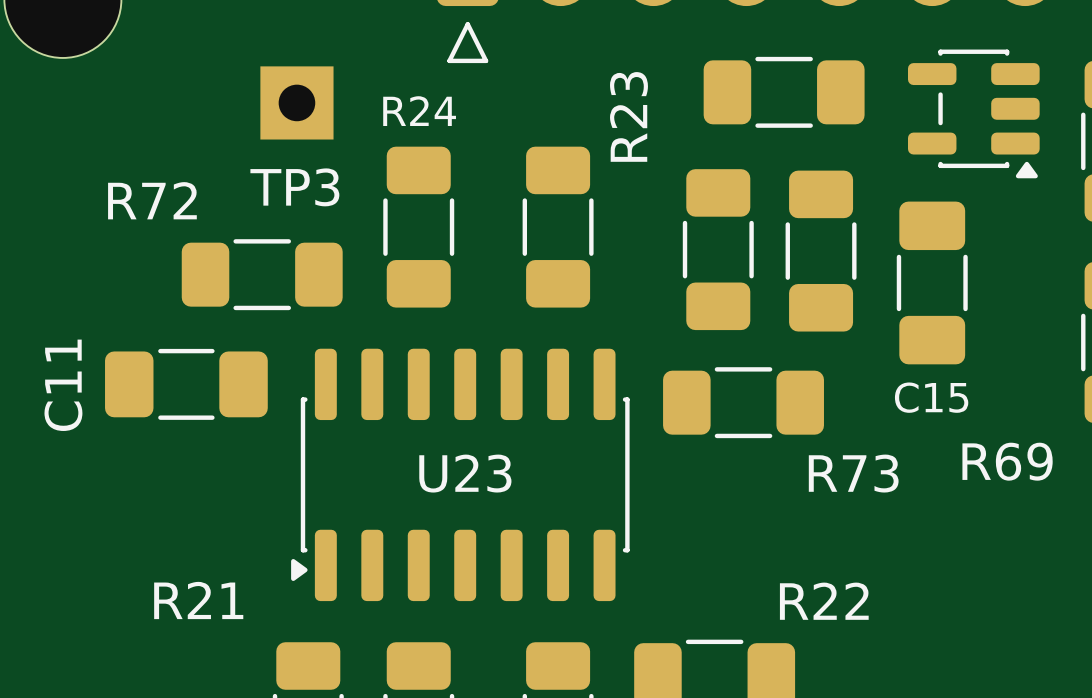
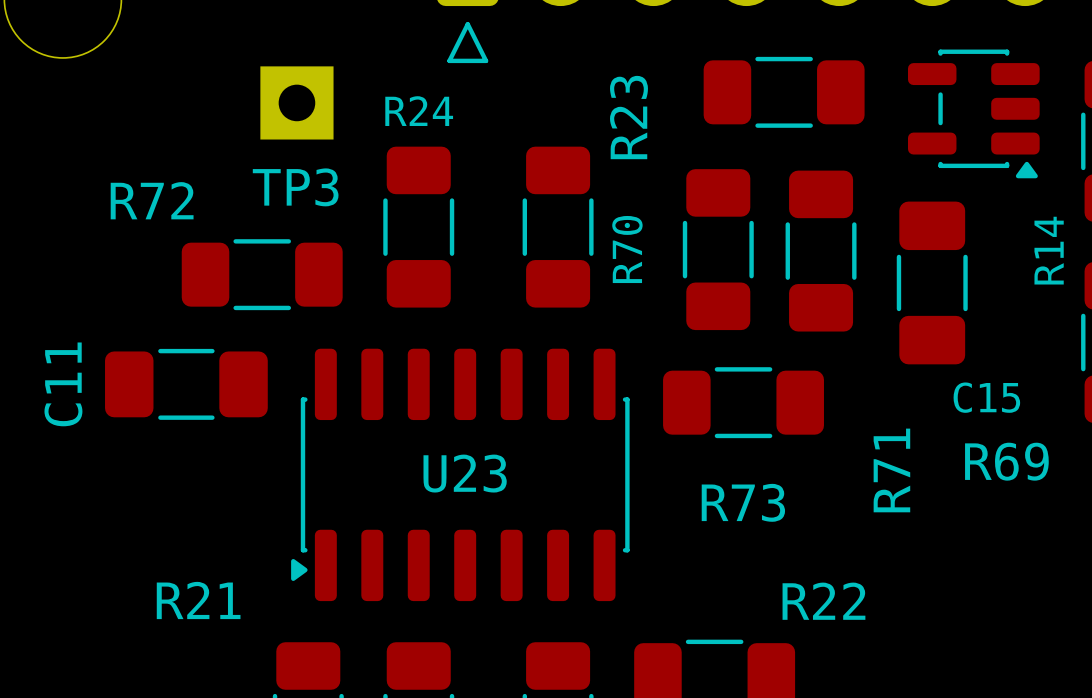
R70 name: none -> R70 (627, 249)
R14 name: none -> R14 (1049, 250)
C15 name position: C15 (931, 397) -> C15 (986, 397)
R71 name: none -> R71 (891, 470)
R73 name position: R73 (853, 473) -> R73 (743, 502)

